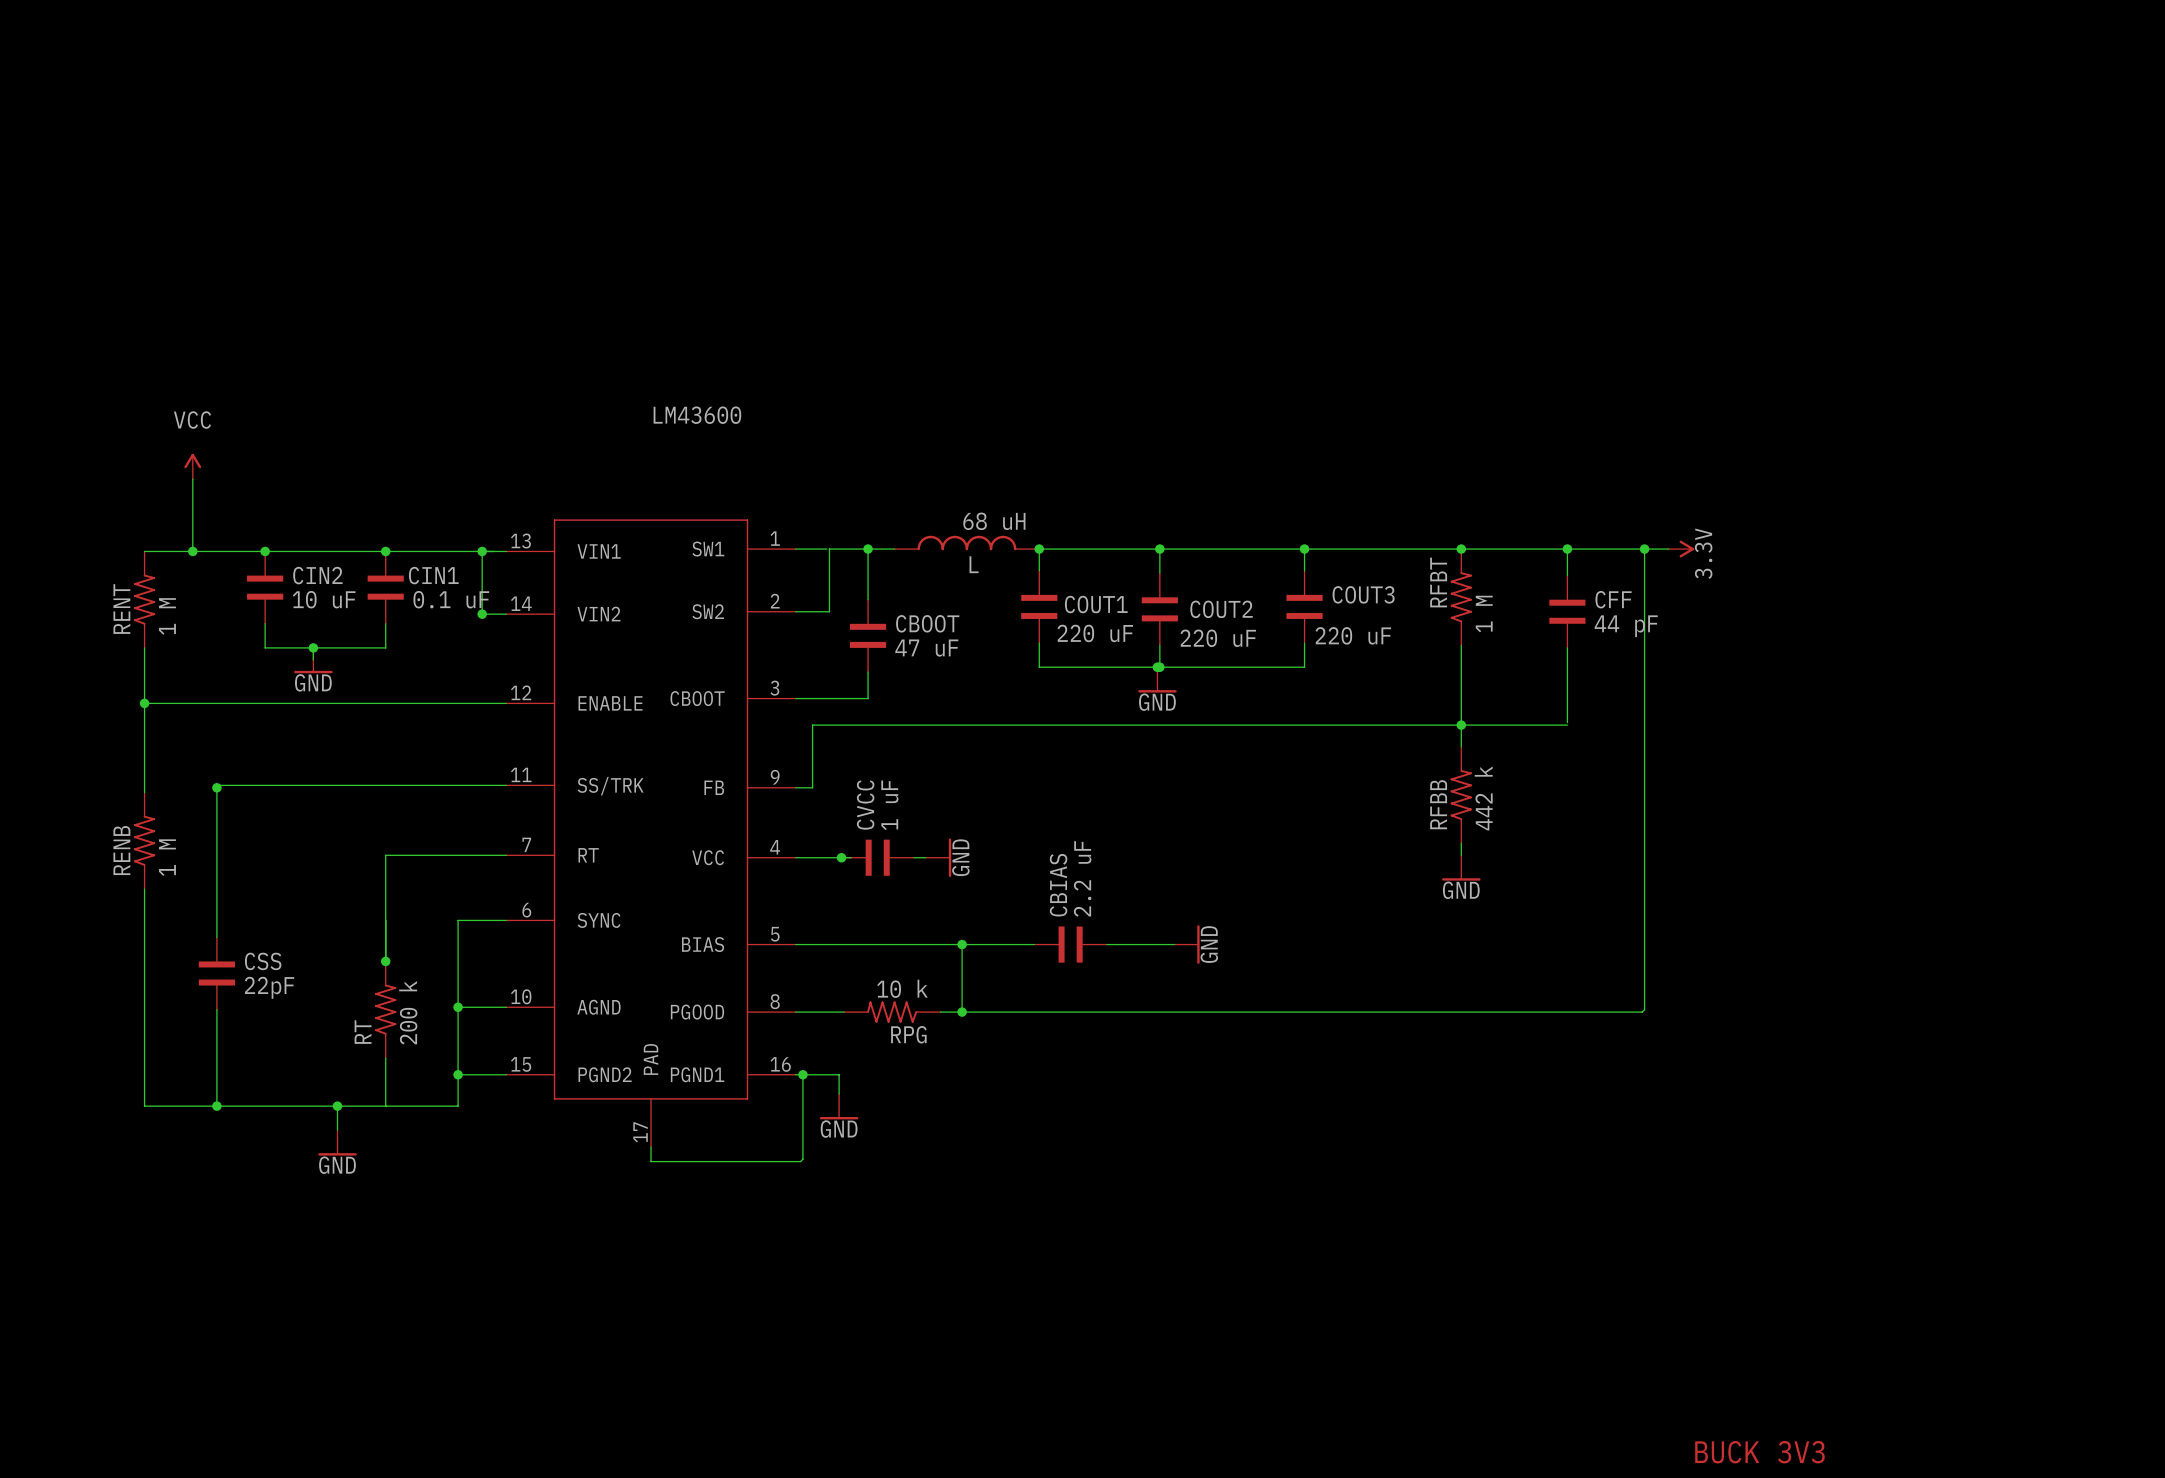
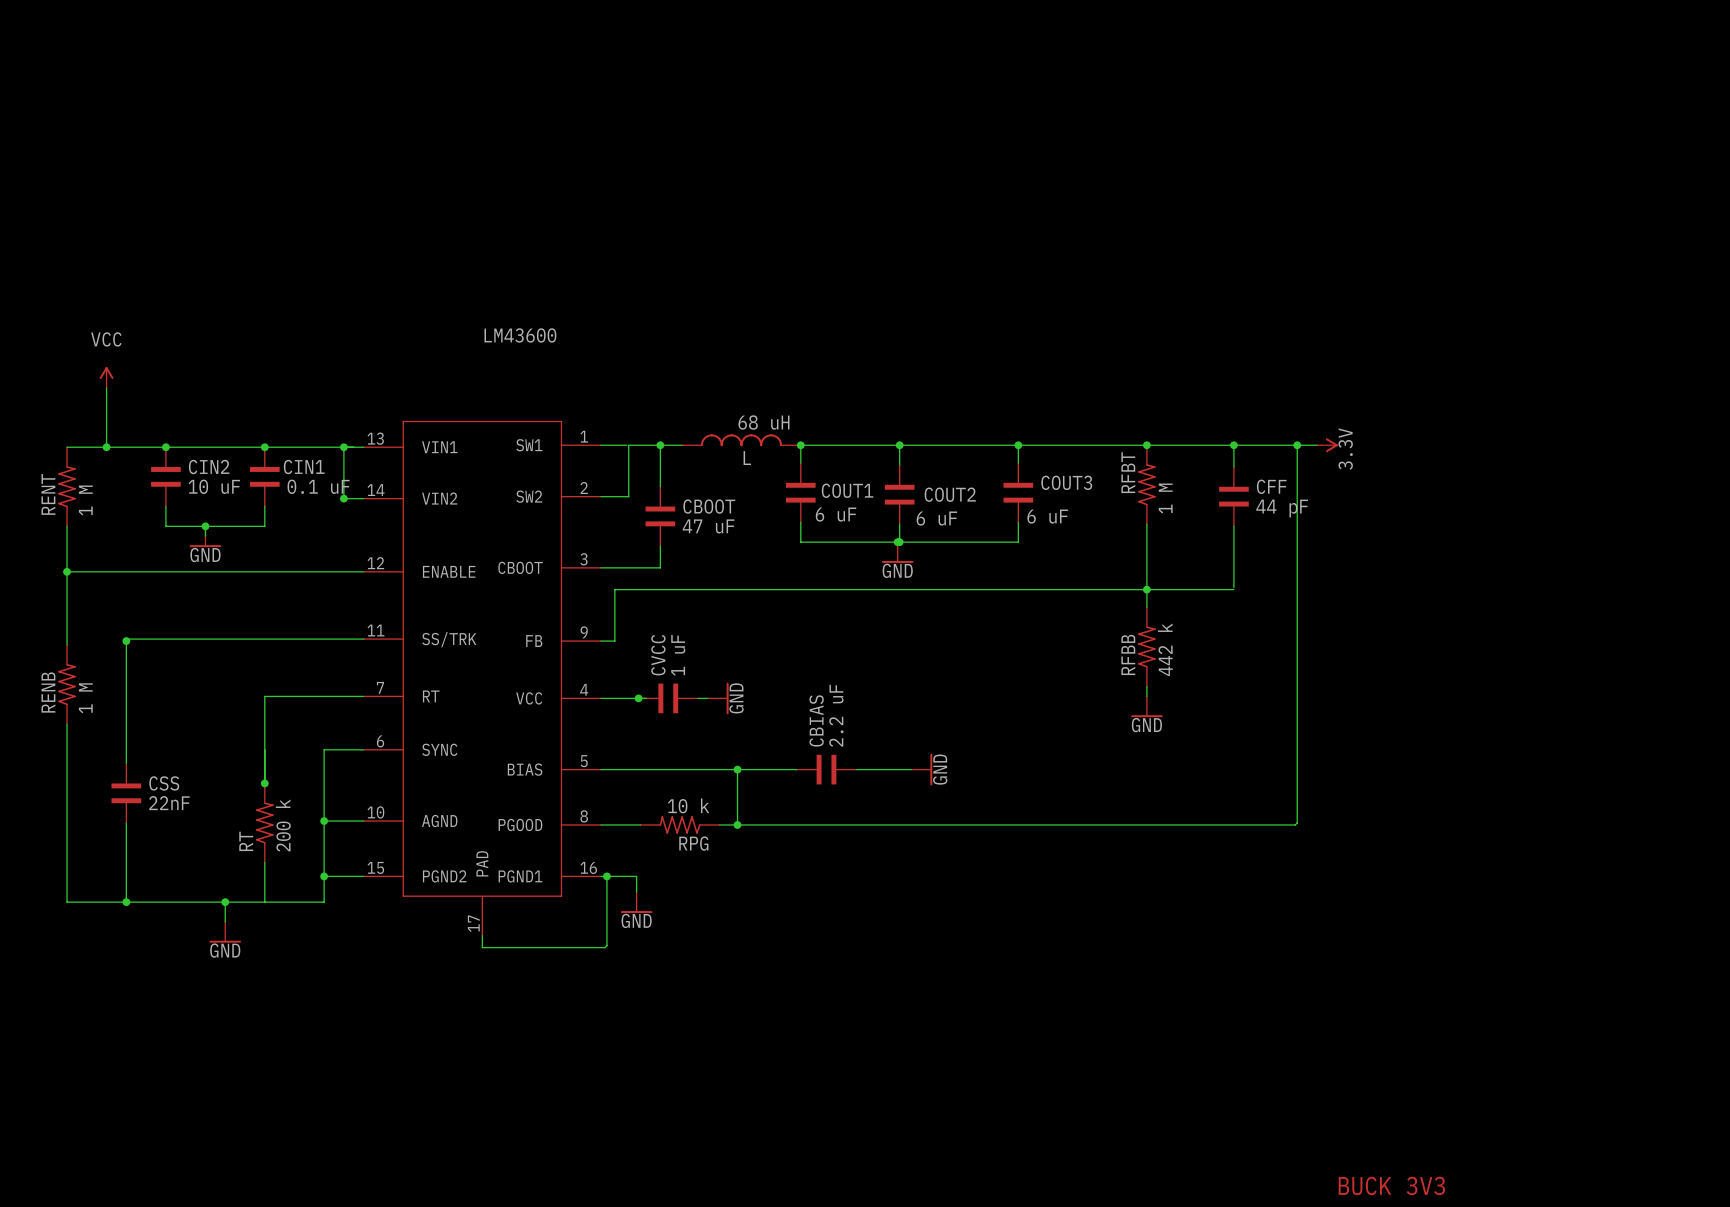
COUT1 value: 220 uF (1095, 633) -> 6 uF (836, 514)
COUT3 value: 220 uF (1353, 635) -> 6 uF (1047, 516)
COUT2 value: 220 uF (1218, 638) -> 6 uF (936, 518)
CSS value: 22pF (269, 987) -> 22nF (169, 803)

